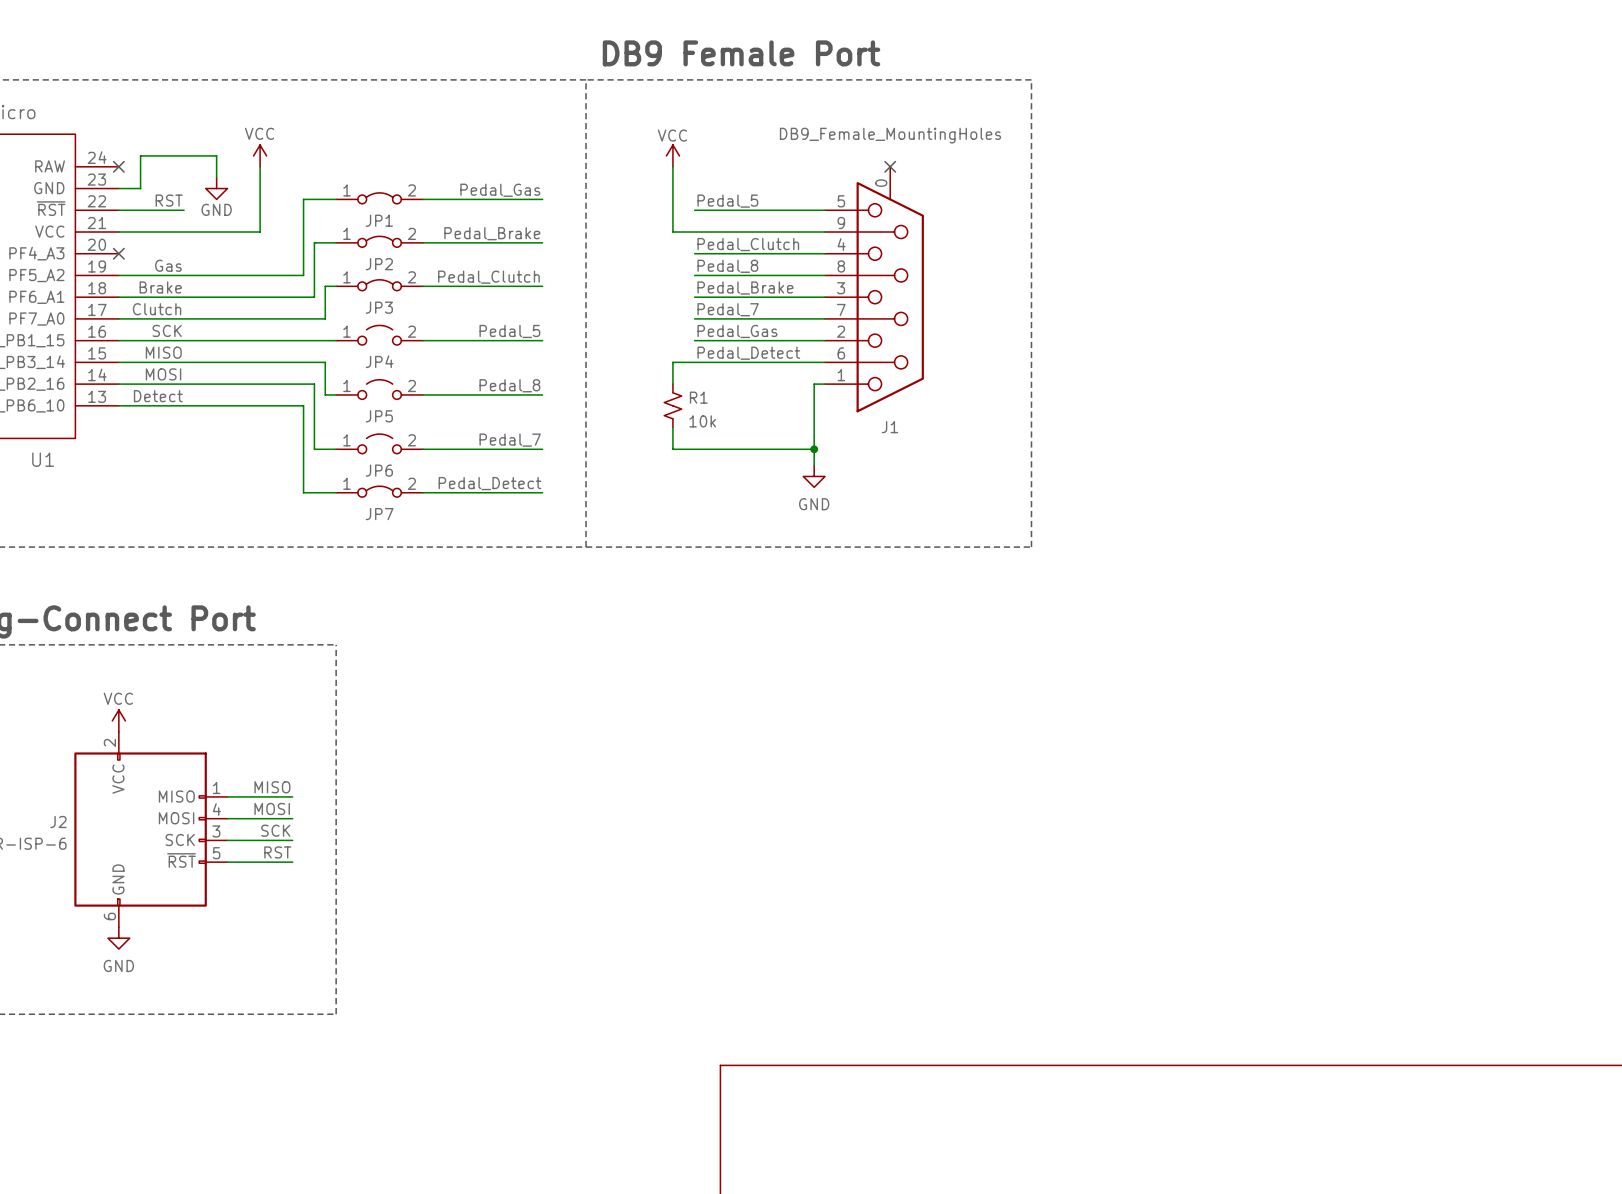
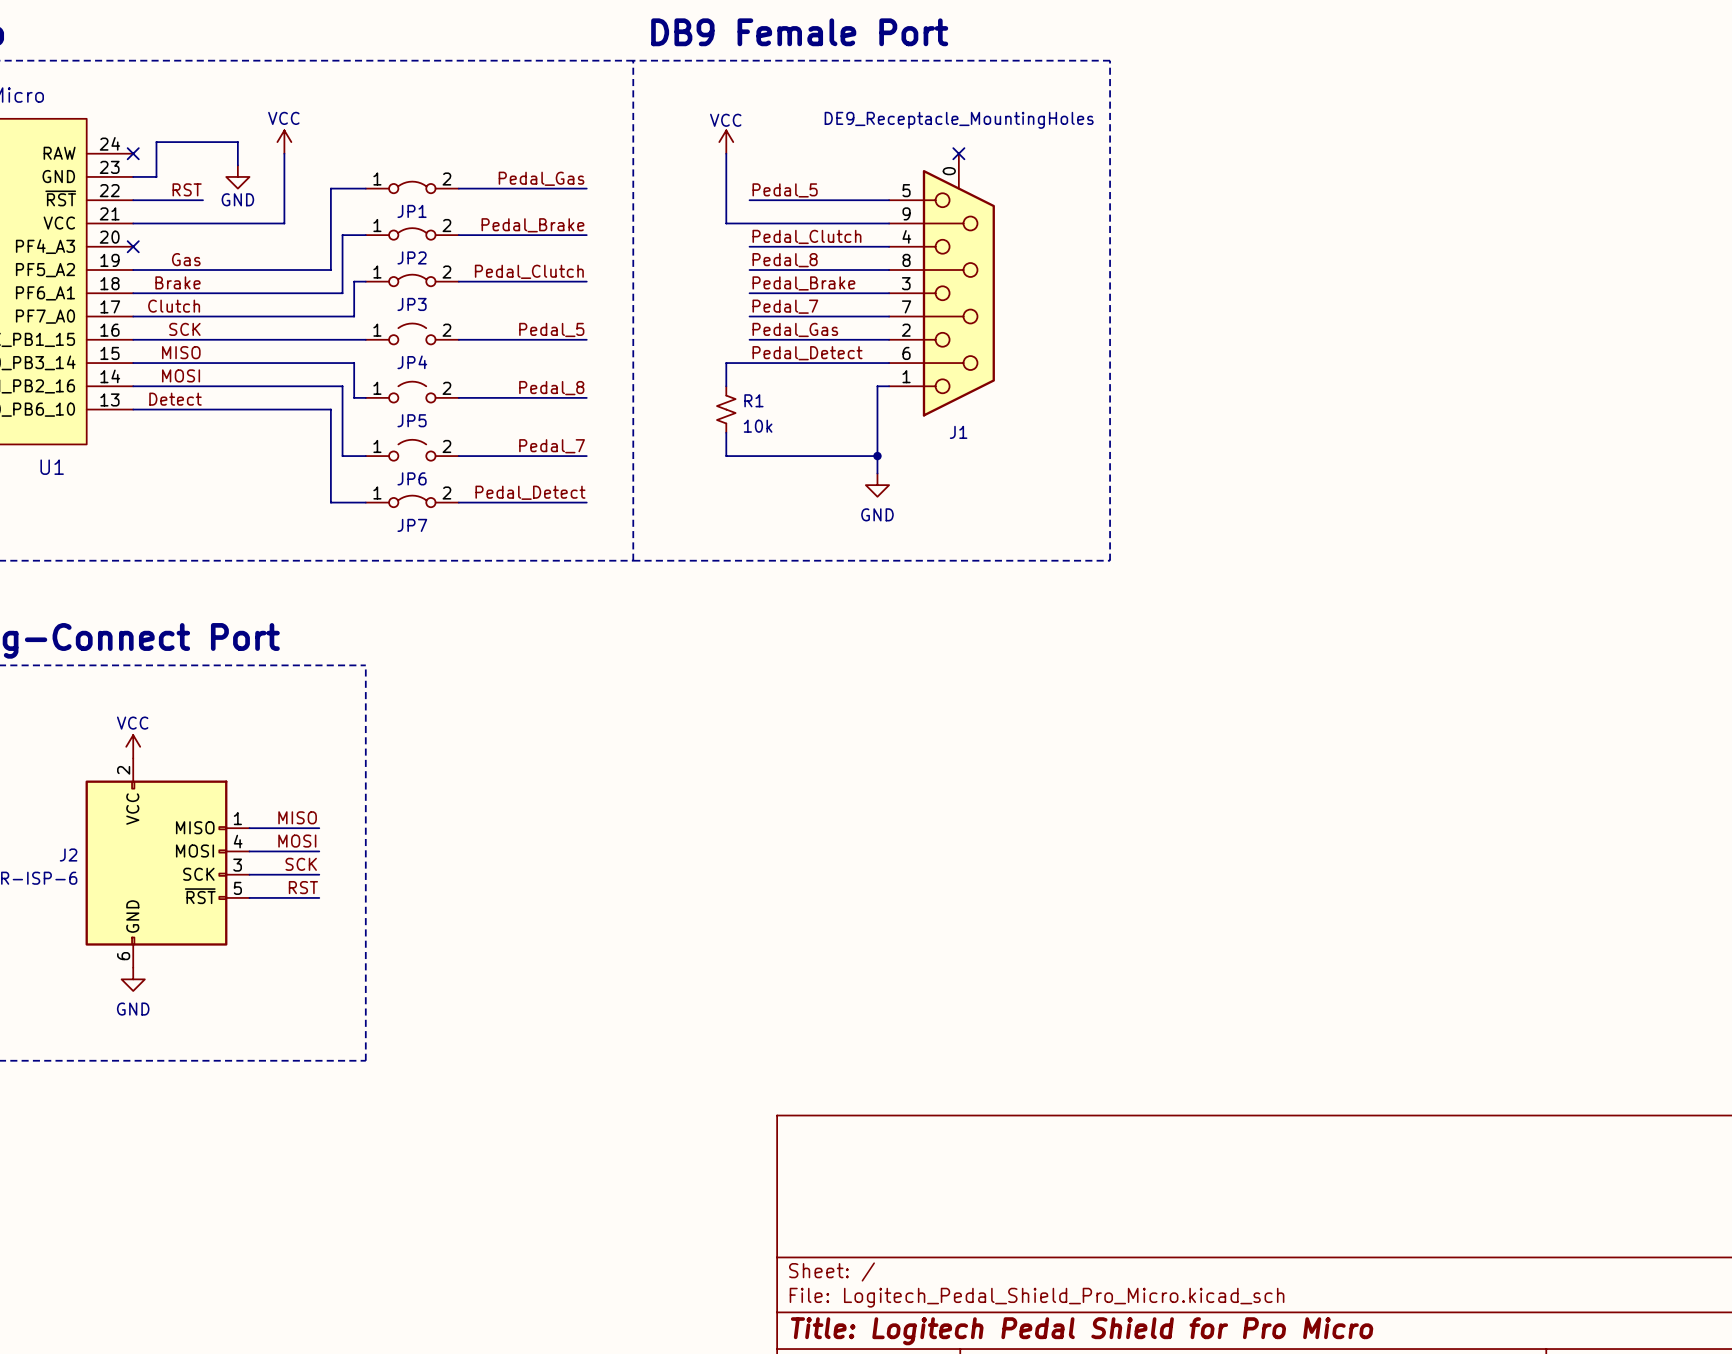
J1 value: DB9_Female_MountingHoles (890, 135) -> DE9_Receptacle_MountingHoles (959, 120)

